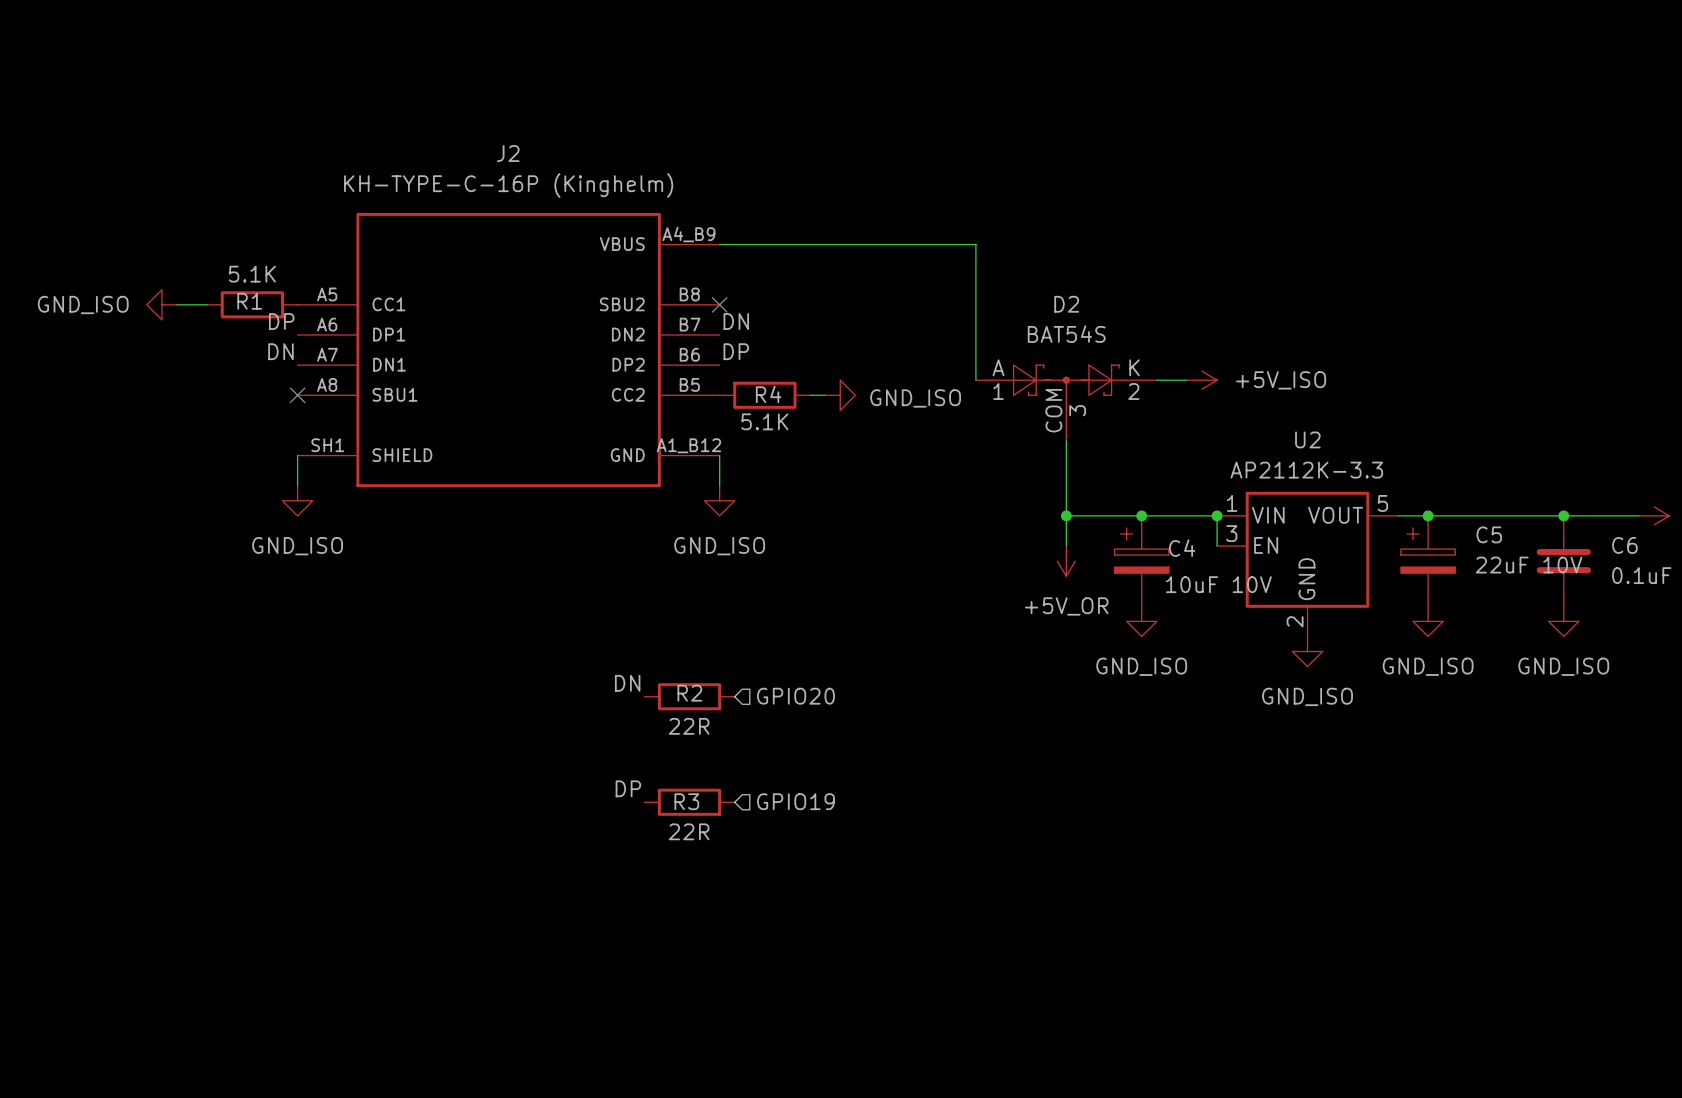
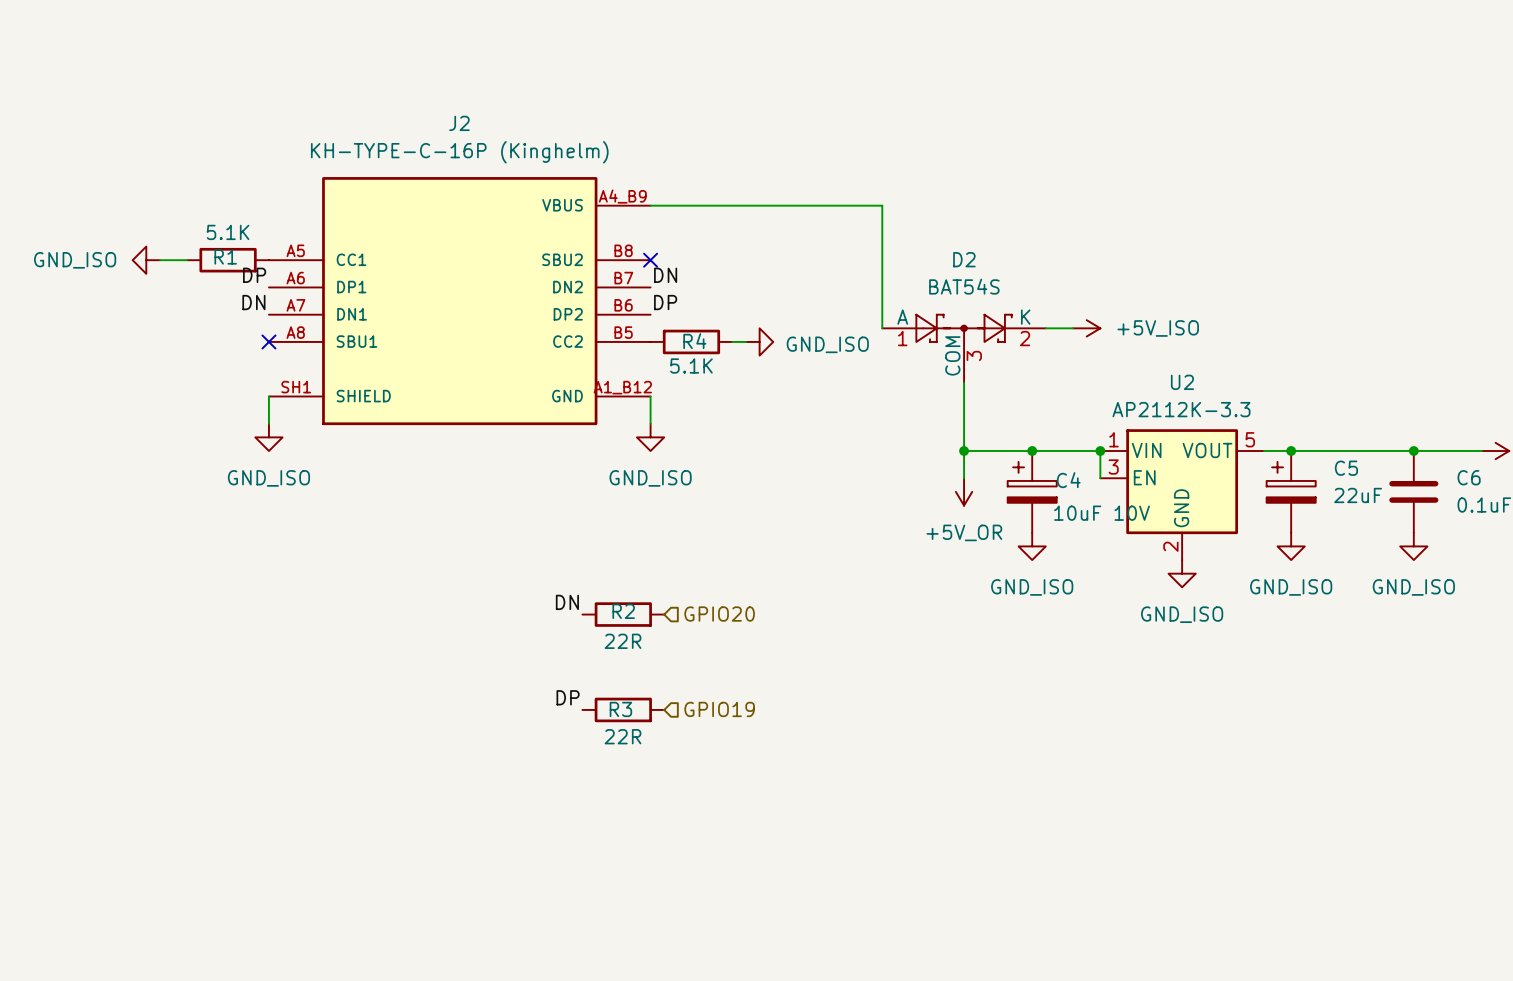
C5 value: 22uF 10V (1529, 565) -> 22uF (1358, 495)

